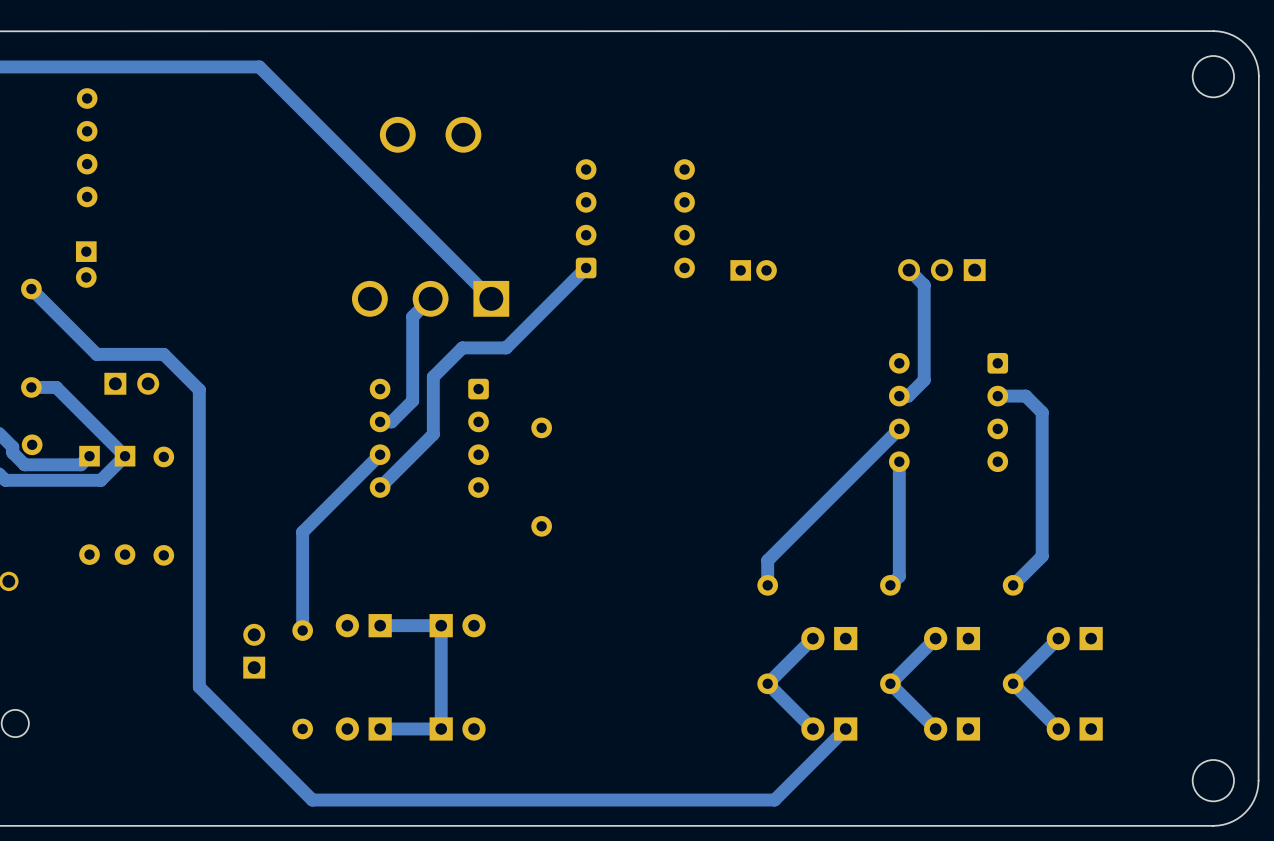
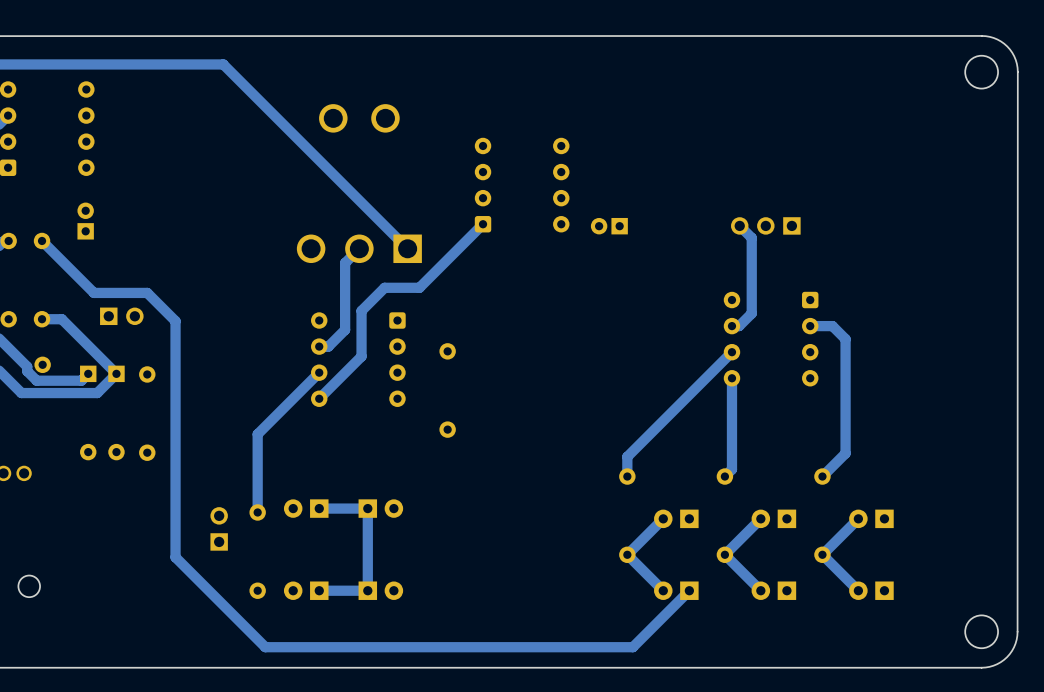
part rotation: 0° (86, 264) -> 180° (85, 221)
part rotation: 0° (753, 270) -> 180° (609, 226)

